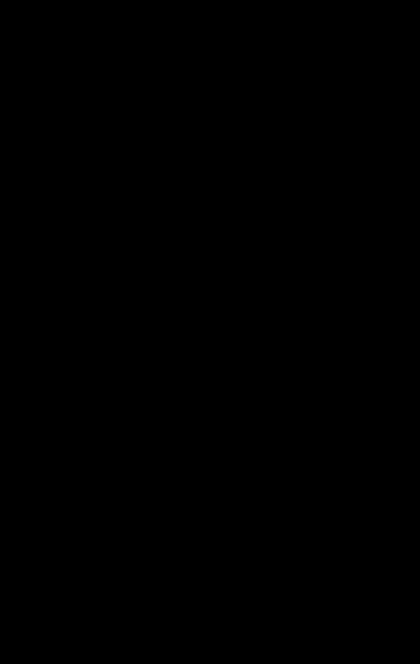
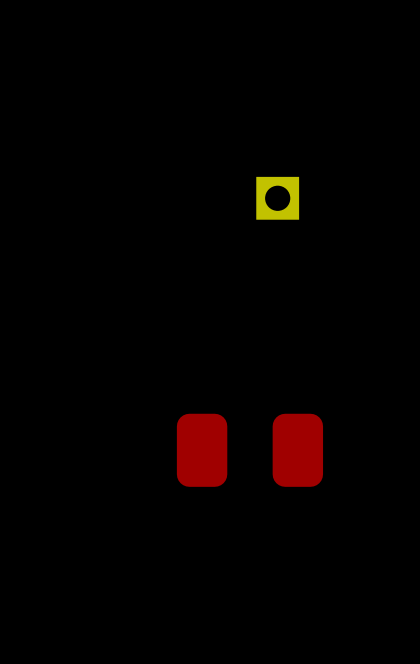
part: none -> (277, 198)
part: none -> (249, 450)

